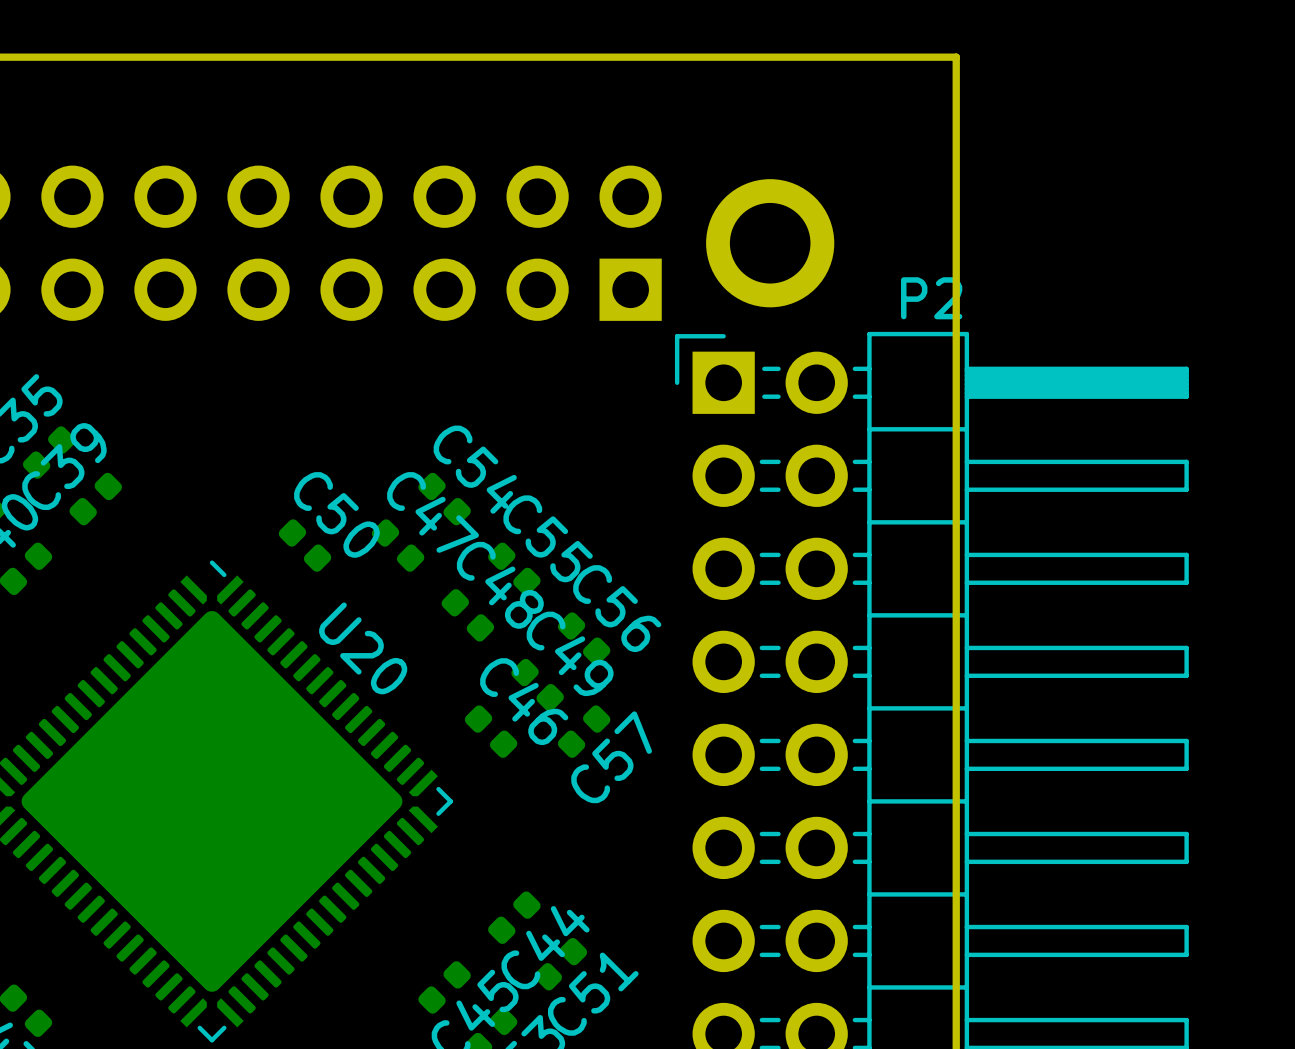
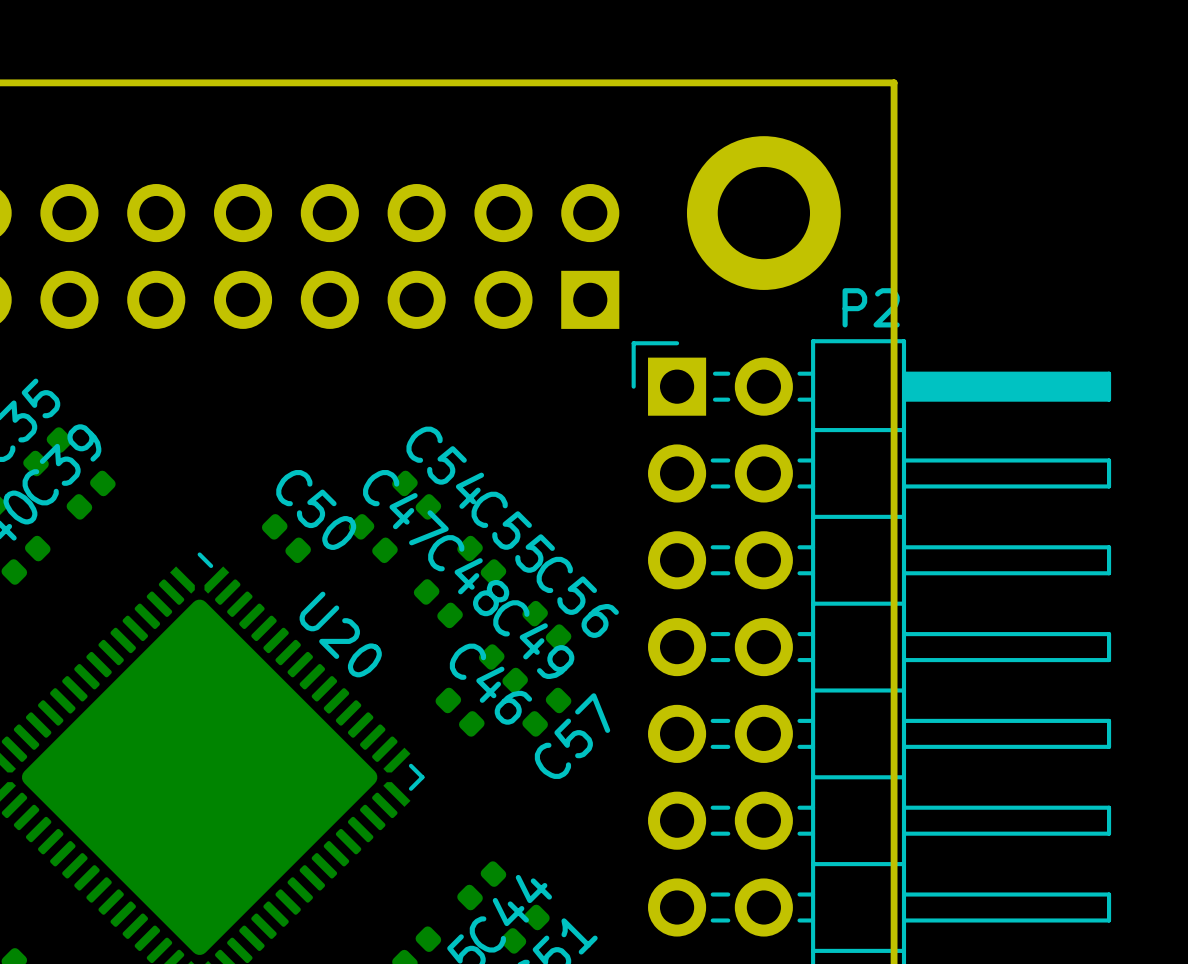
part: none -> (763, 213)
part: (770, 243) -> none

